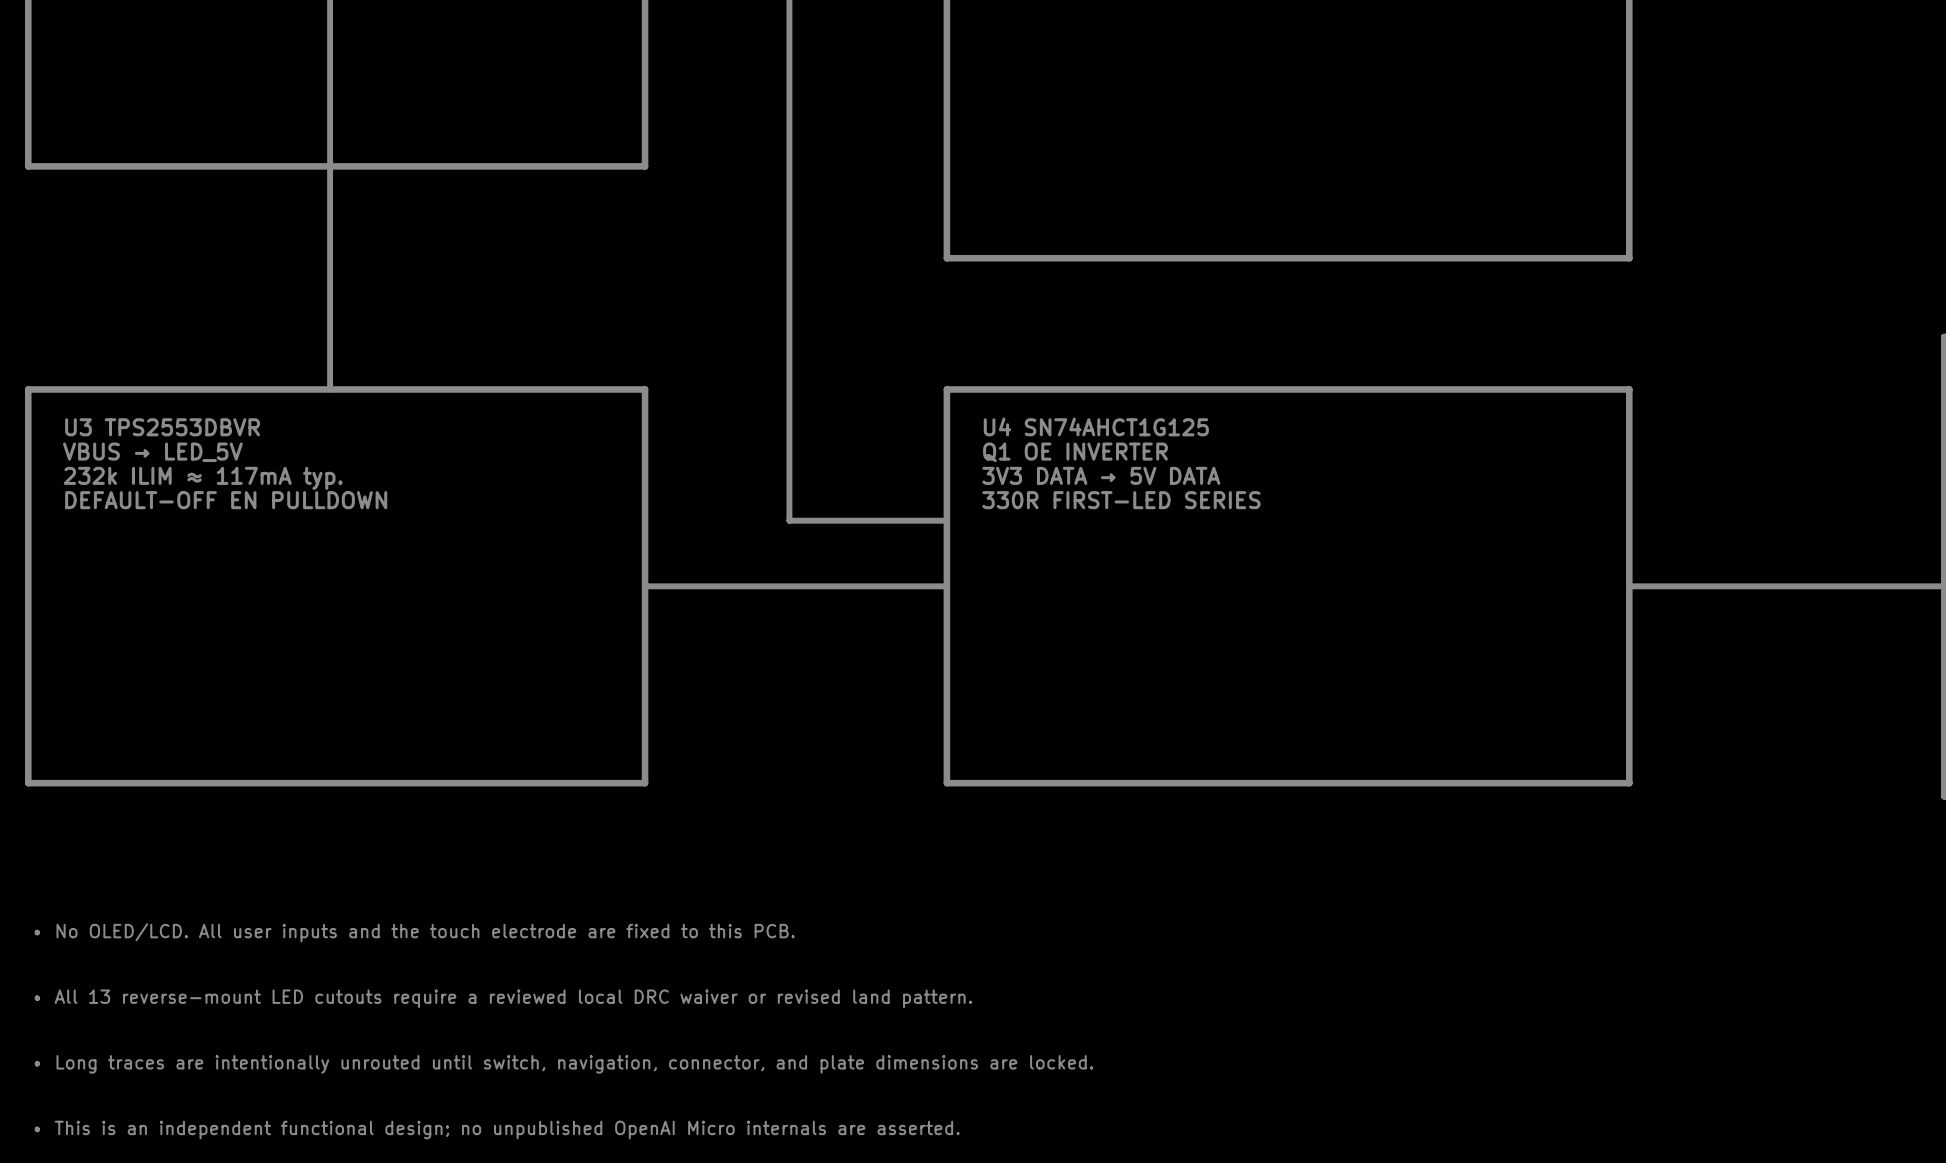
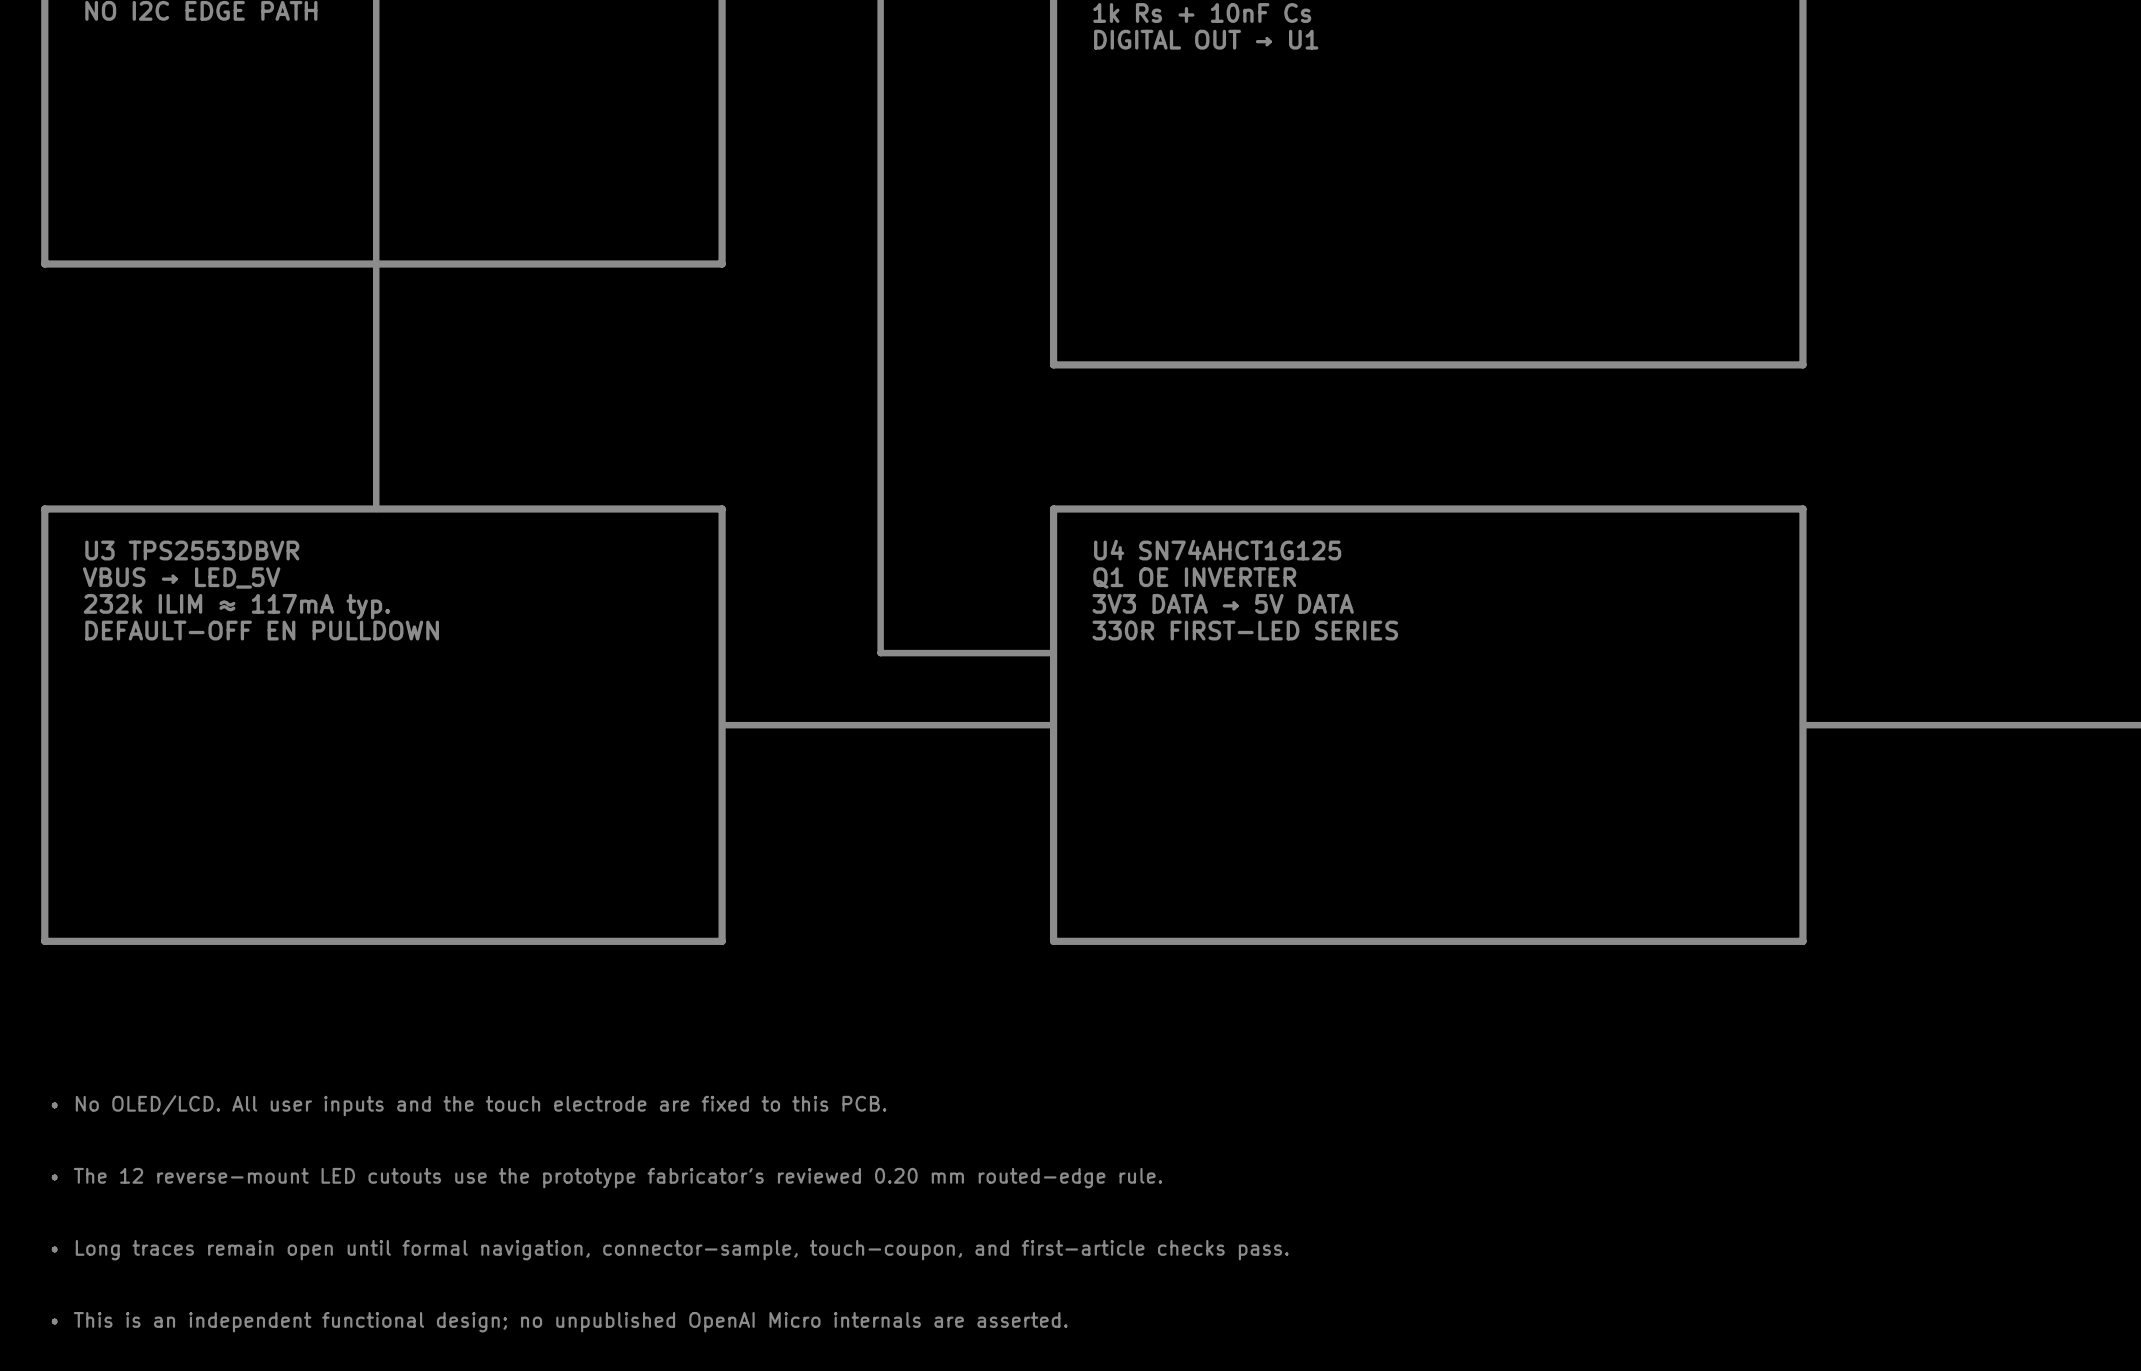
text: • All 13 reverse-mount LED cutouts require a reviewed local DRC waiver or revised land pattern. (503, 998) -> • The 12 reverse-mount LED cutouts use the prototype fabricator's reviewed 0.20 mm routed-edge rule. (606, 1178)
text: • Long traces are intentionally unrouted until switch, navigation, connector, and plate dimensions are locked. (563, 1064) -> • Long traces remain open until formal navigation, connector-sample, touch-coupon, and first-article checks pass. (670, 1250)

